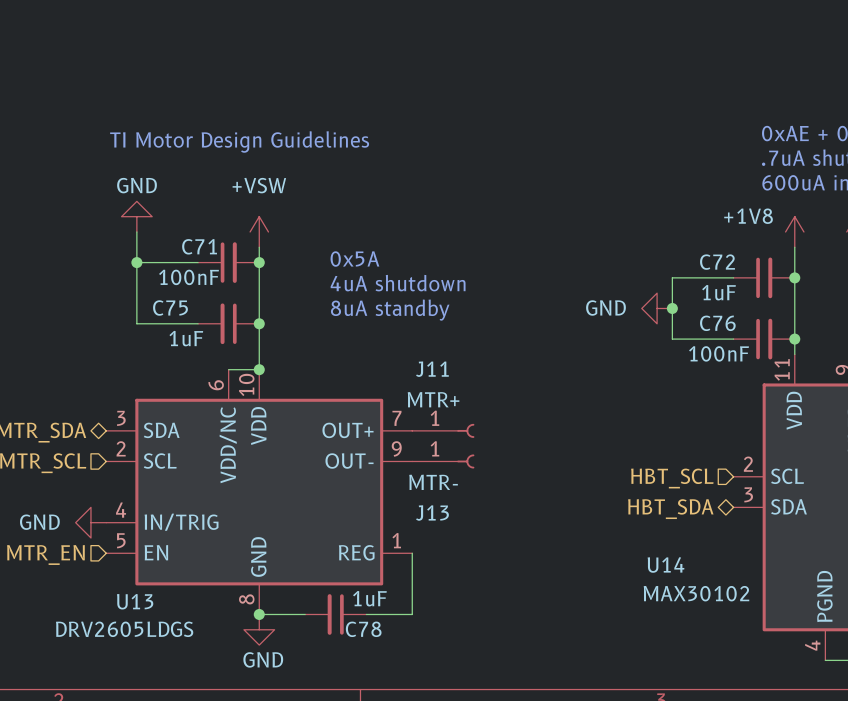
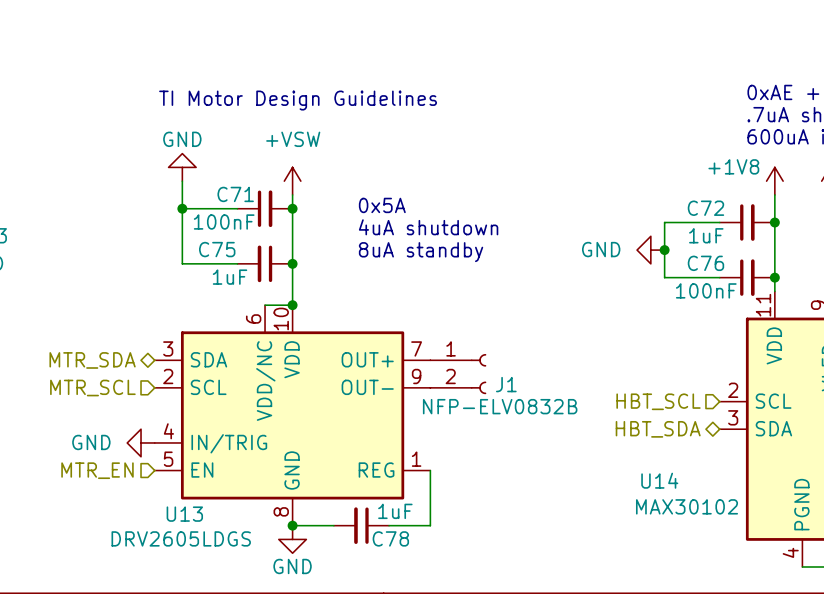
J11: MTR+ (443, 430) -> none
J1: none -> NFP-ELV0832B (458, 374)
J13: MTR- (443, 461) -> none

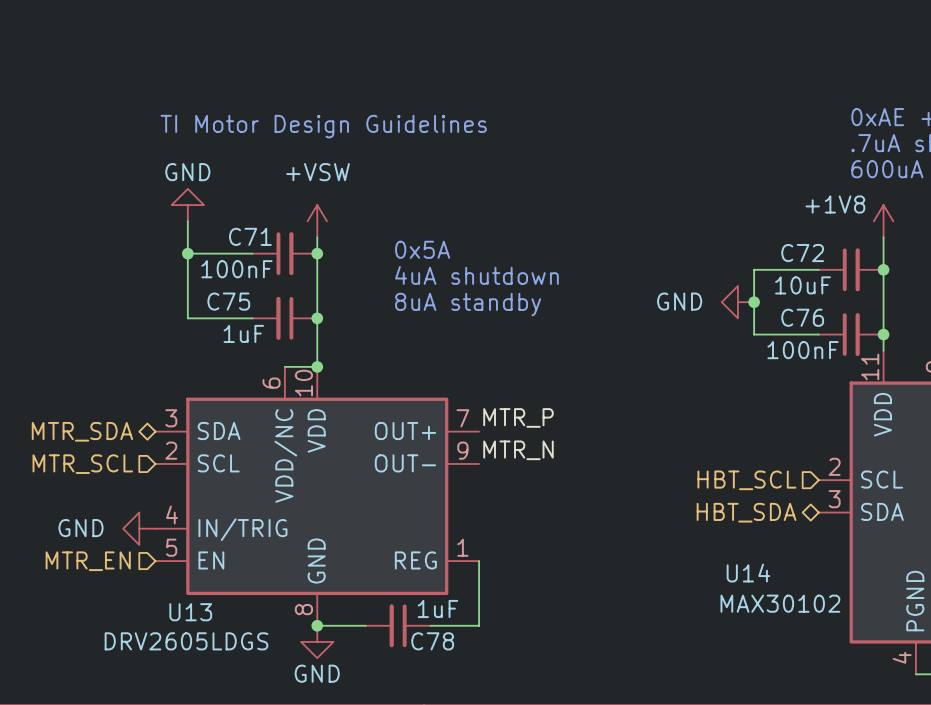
C72 value: 1uF (706, 235) -> 10uF (803, 285)
label: none -> MTR_P (518, 417)
J1: NFP-ELV0832B (458, 374) -> none
label: none -> MTR_N (518, 450)

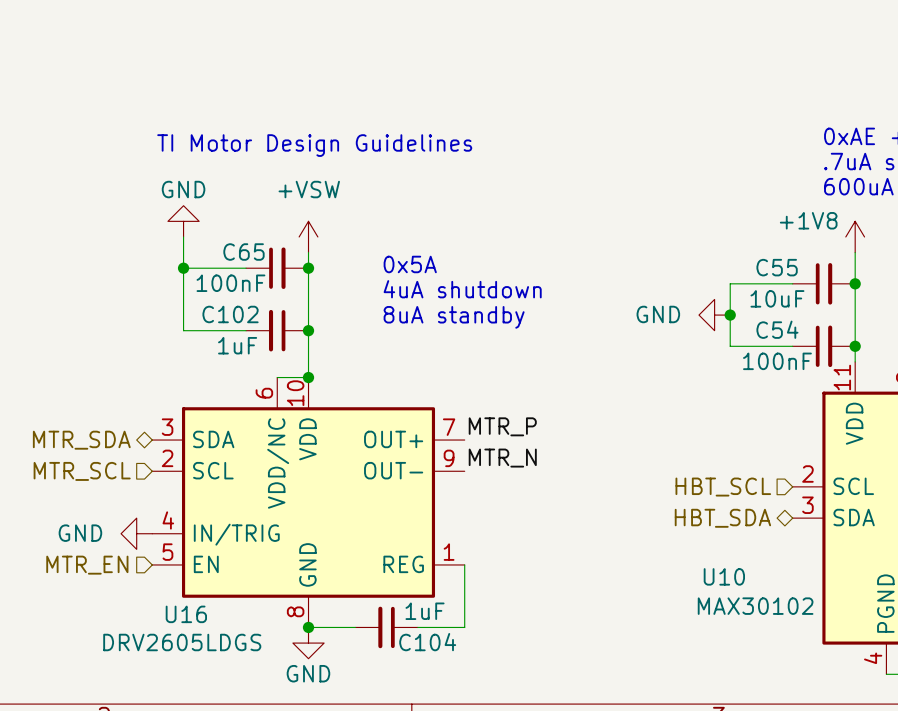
C71 name: C71 (250, 236) -> C65 (243, 252)
C72 name: C72 (802, 253) -> C55 (777, 267)
C75 name: C75 (228, 301) -> C102 (230, 314)
C76 name: C76 (802, 317) -> C54 (777, 329)
U14 name: U14 (748, 573) -> U10 (724, 576)
U13 name: U13 (190, 612) -> U16 (186, 614)
C78 name: C78 (432, 641) -> C104 (427, 642)

